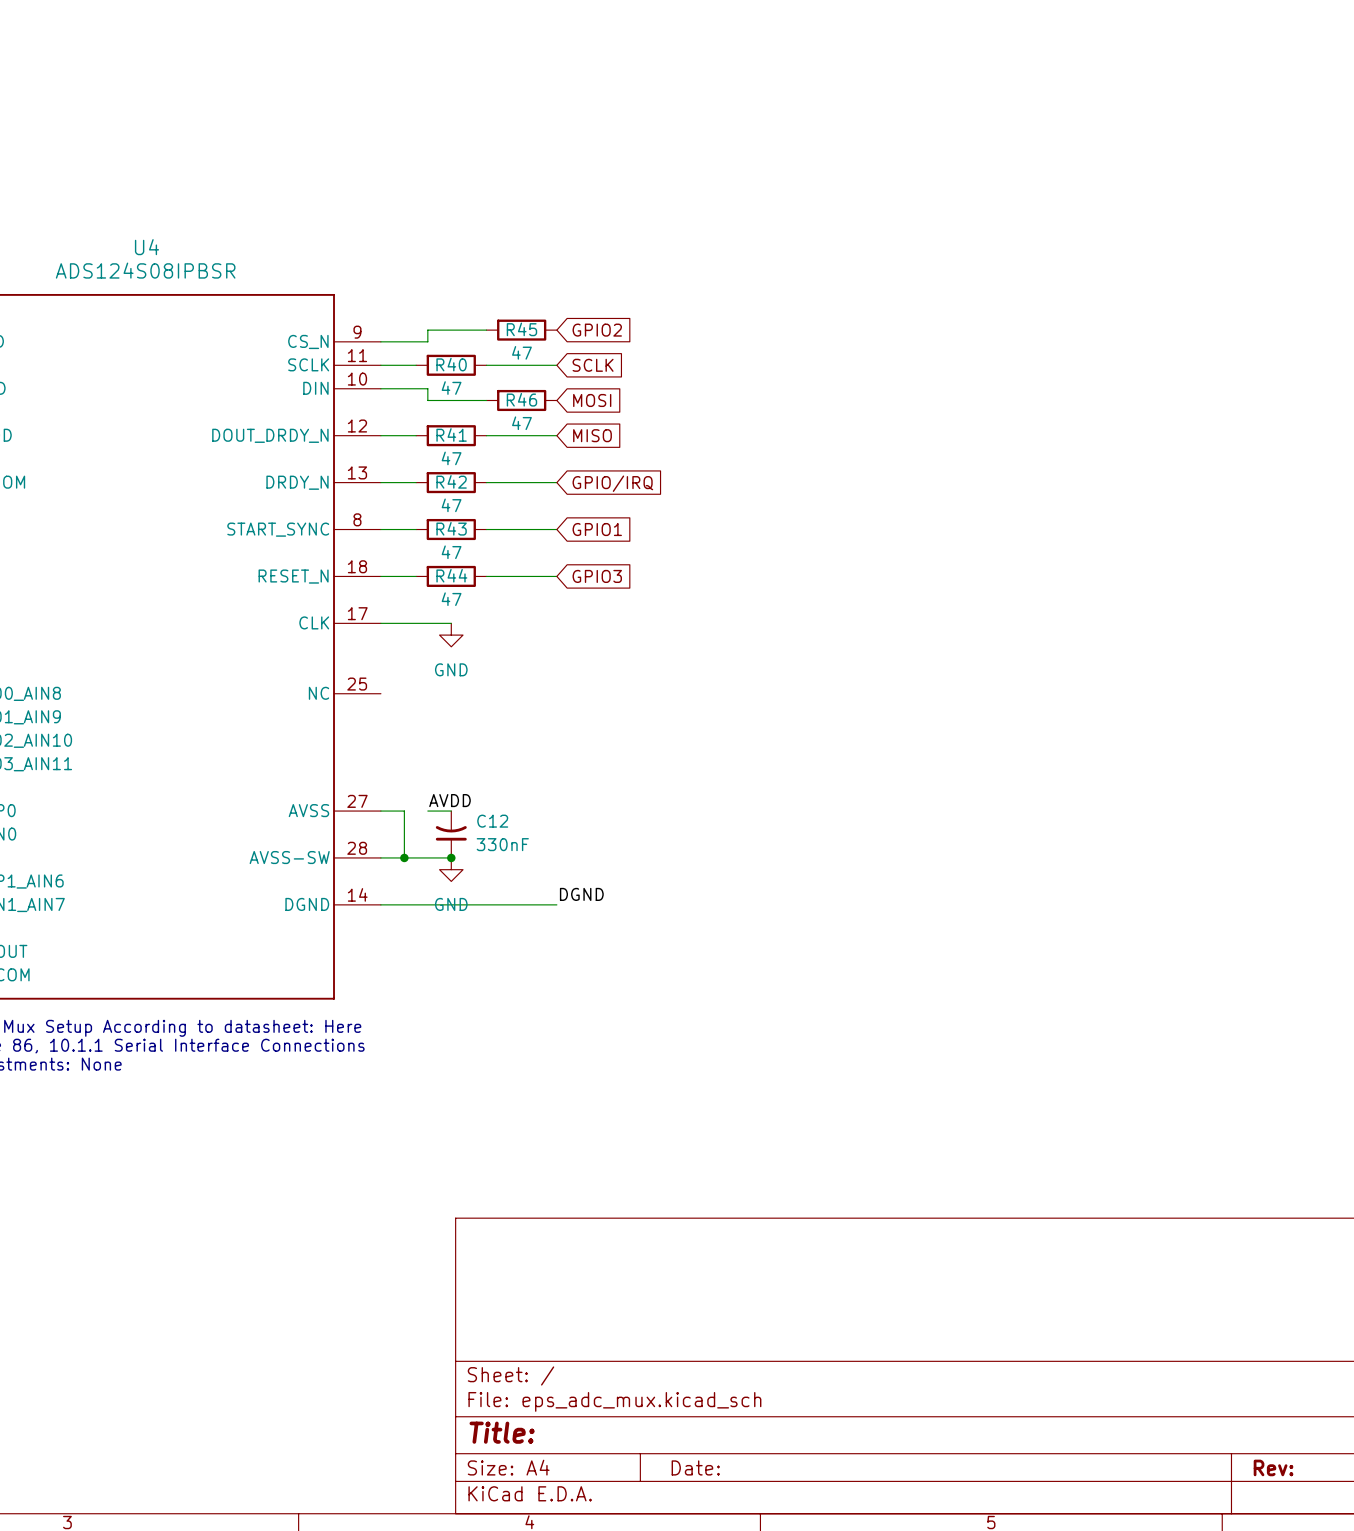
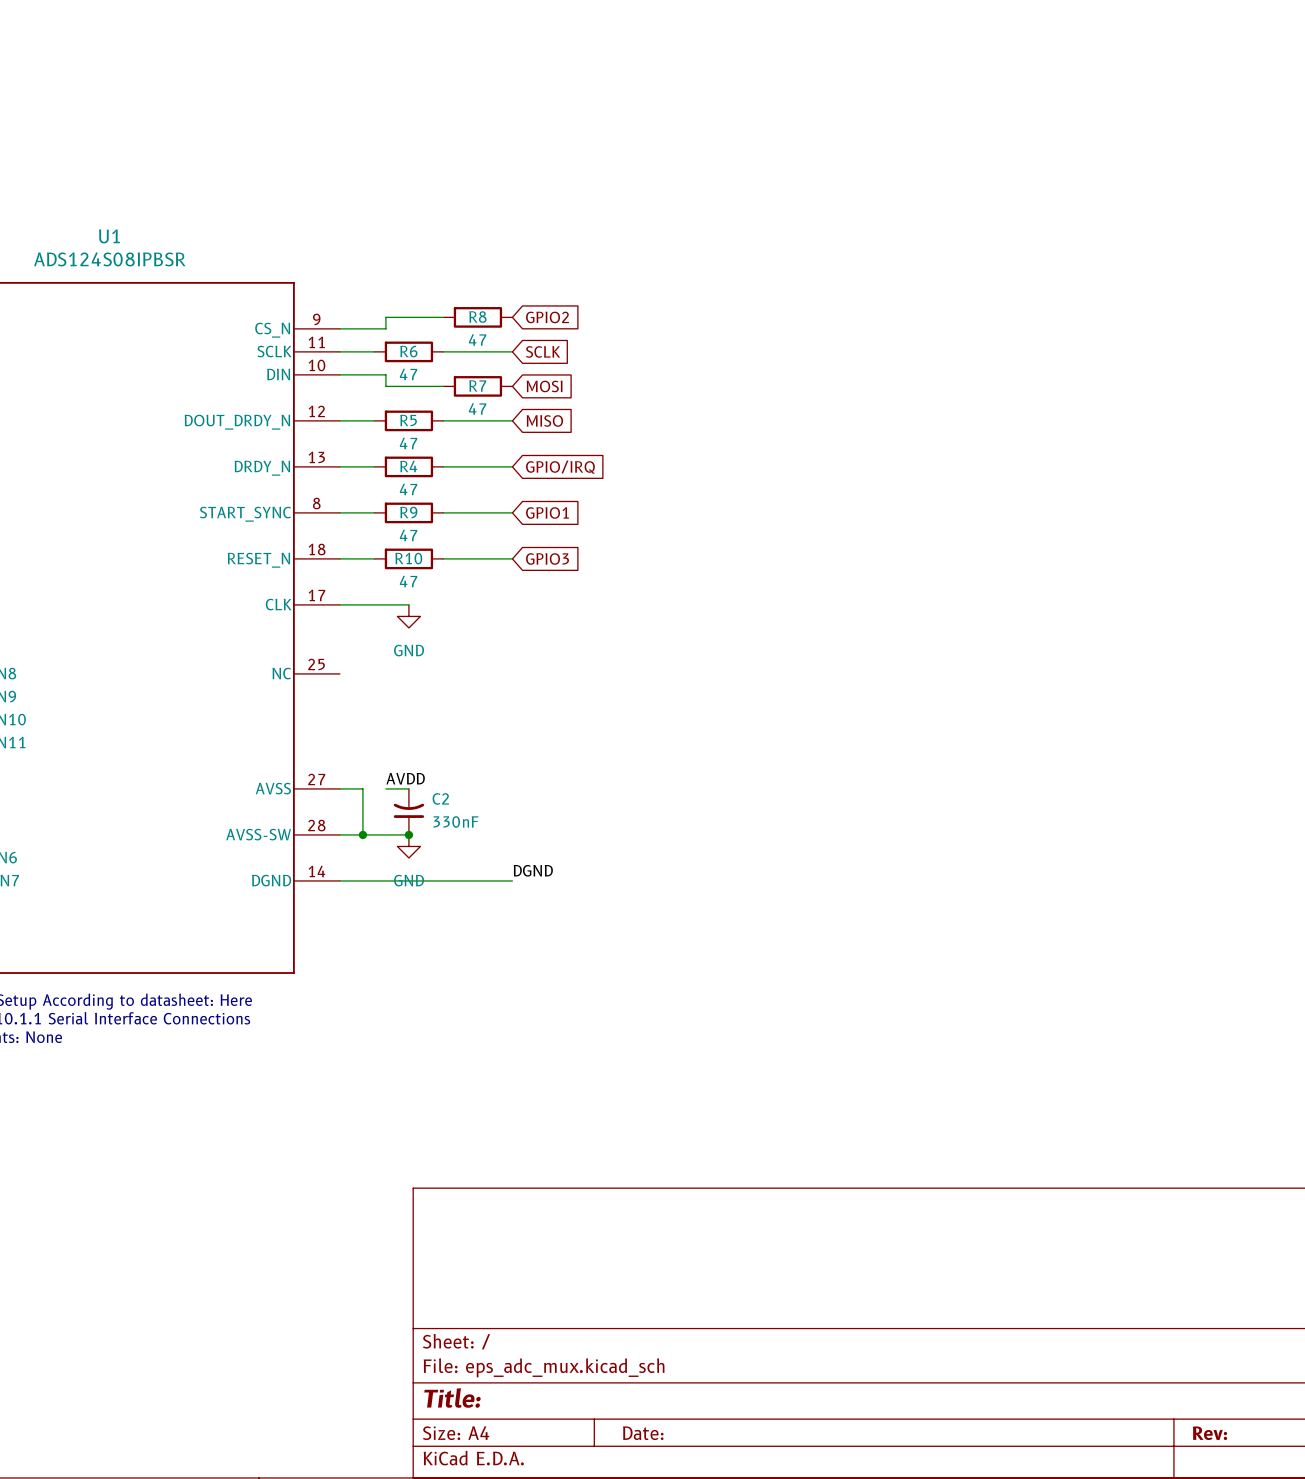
U4 name: U4 (146, 247) -> U1 (109, 236)
R45 name: R45 (521, 329) -> R8 (477, 317)
R40 name: R40 (451, 364) -> R6 (408, 351)
R46 name: R46 (521, 399) -> R7 (477, 385)
R41 name: R41 (451, 434) -> R5 (408, 420)
R42 name: R42 (451, 481) -> R4 (408, 466)
R43 name: R43 (451, 528) -> R9 (408, 512)
R44 name: R44 (451, 575) -> R10 (408, 558)
C12 name: C12 (492, 821) -> C2 (440, 798)

